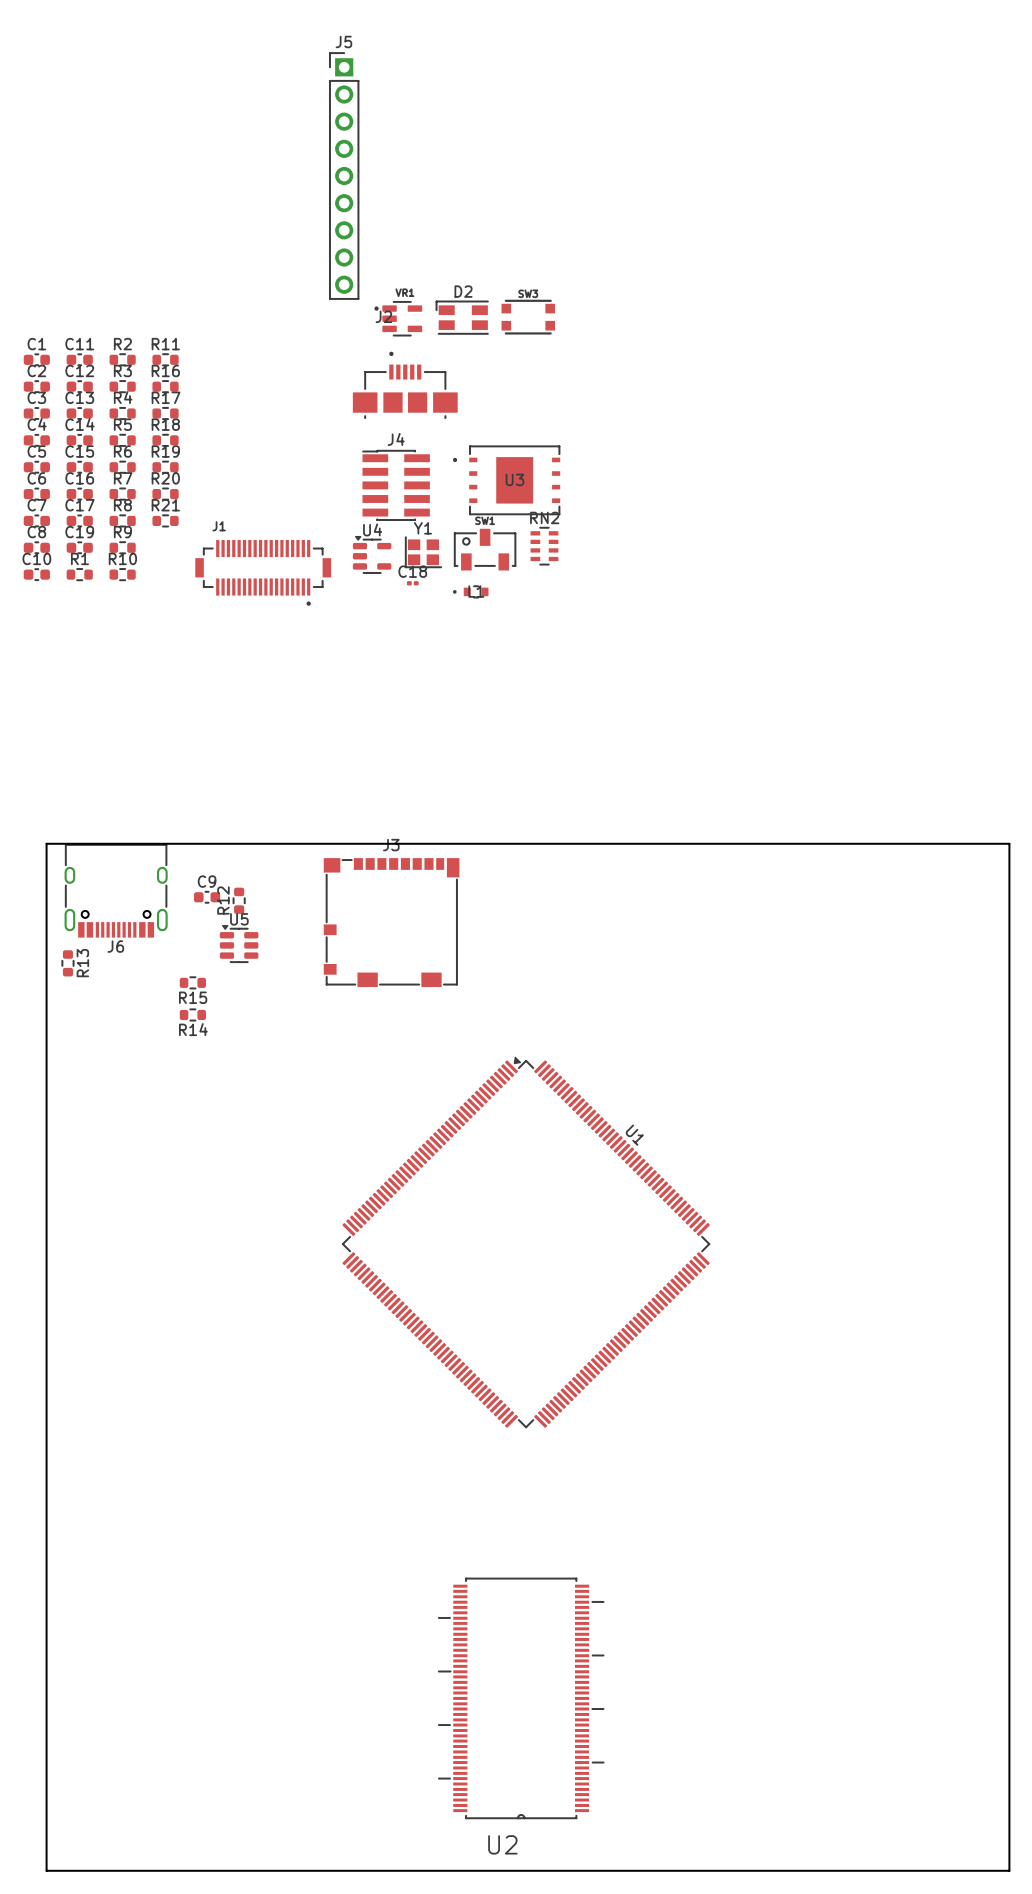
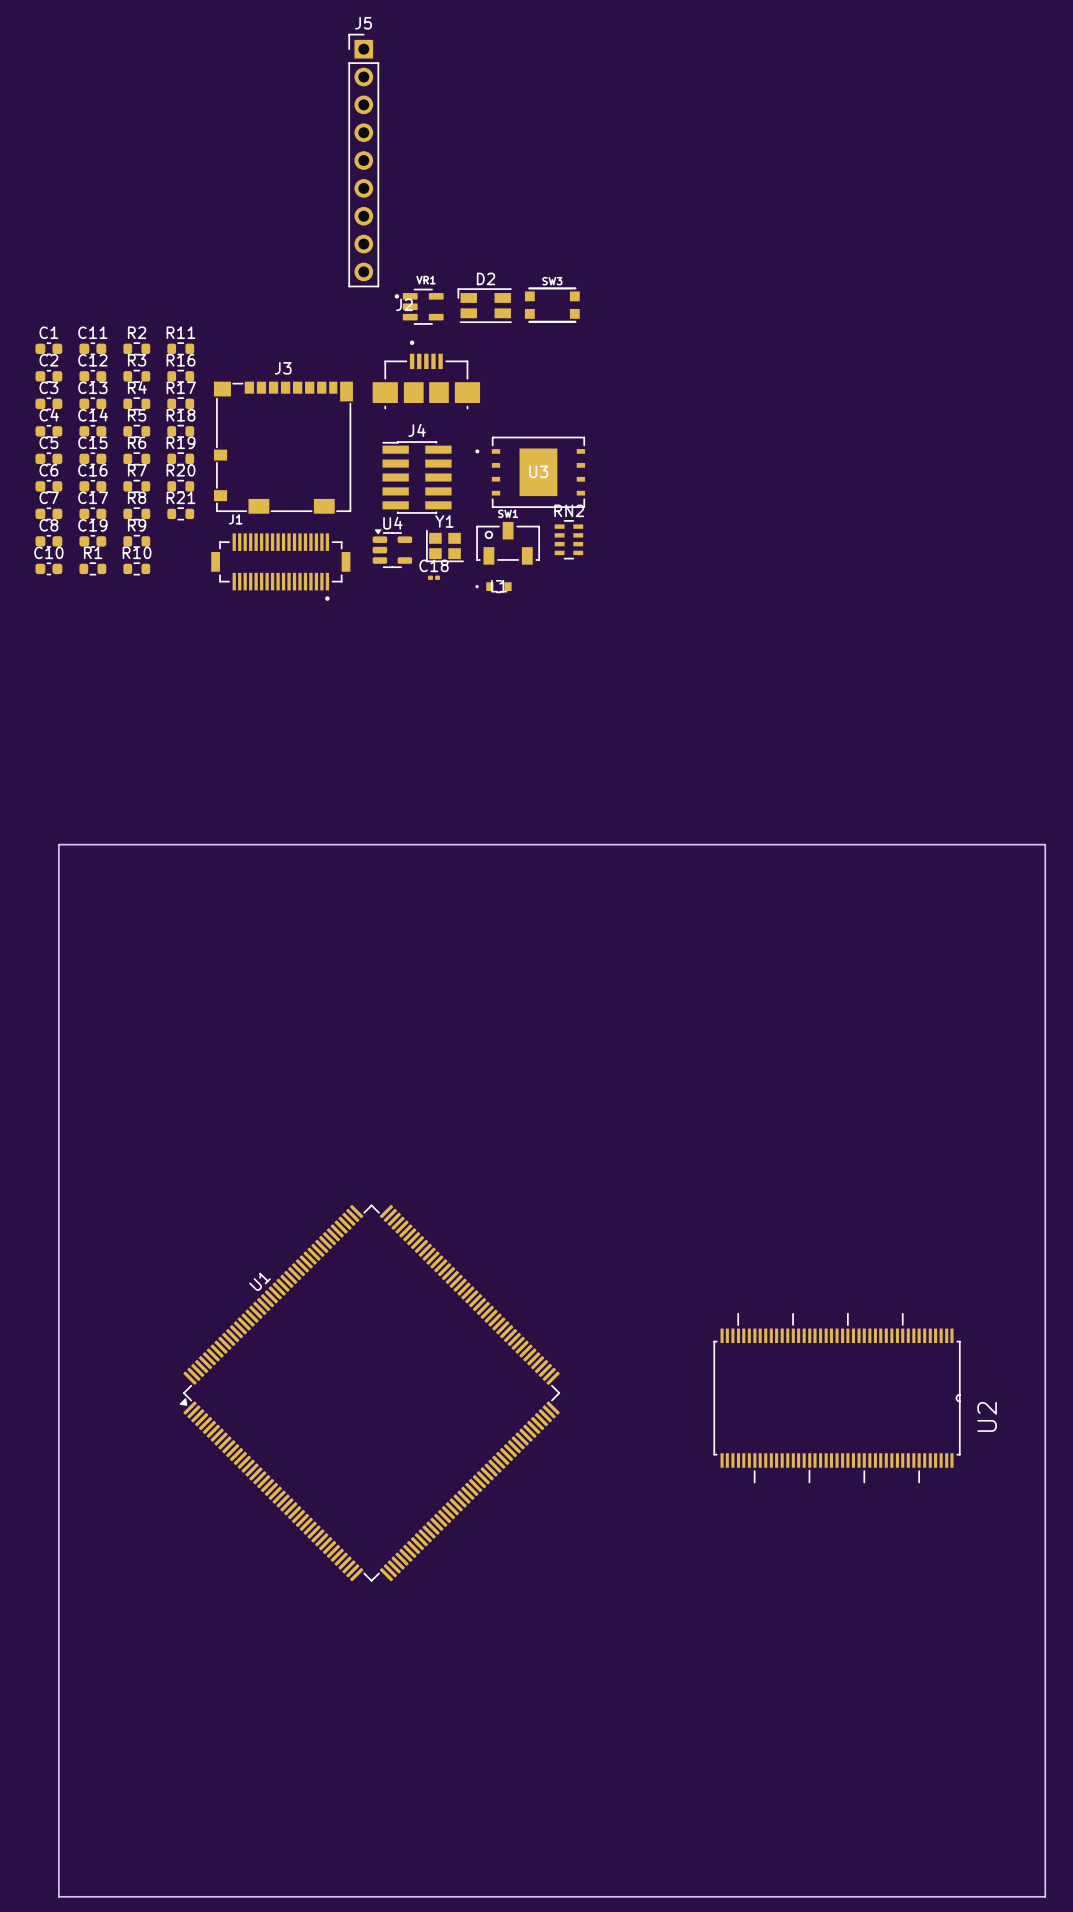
J6: (116, 890) -> none
C9: (207, 897) -> none
R12: (239, 900) -> none
J3 position: (391, 922) -> (283, 447)
U5: (239, 943) -> none
R13: (67, 963) -> none
R15: (192, 982) -> none
R14: (192, 1014) -> none
U1 rotation: 0° (526, 1242) -> 90° counterclockwise (369, 1393)
U1 position: (526, 1242) -> (369, 1393)
U2 rotation: 0° (521, 1698) -> 90° counterclockwise (837, 1398)
U2 position: (521, 1698) -> (837, 1398)

